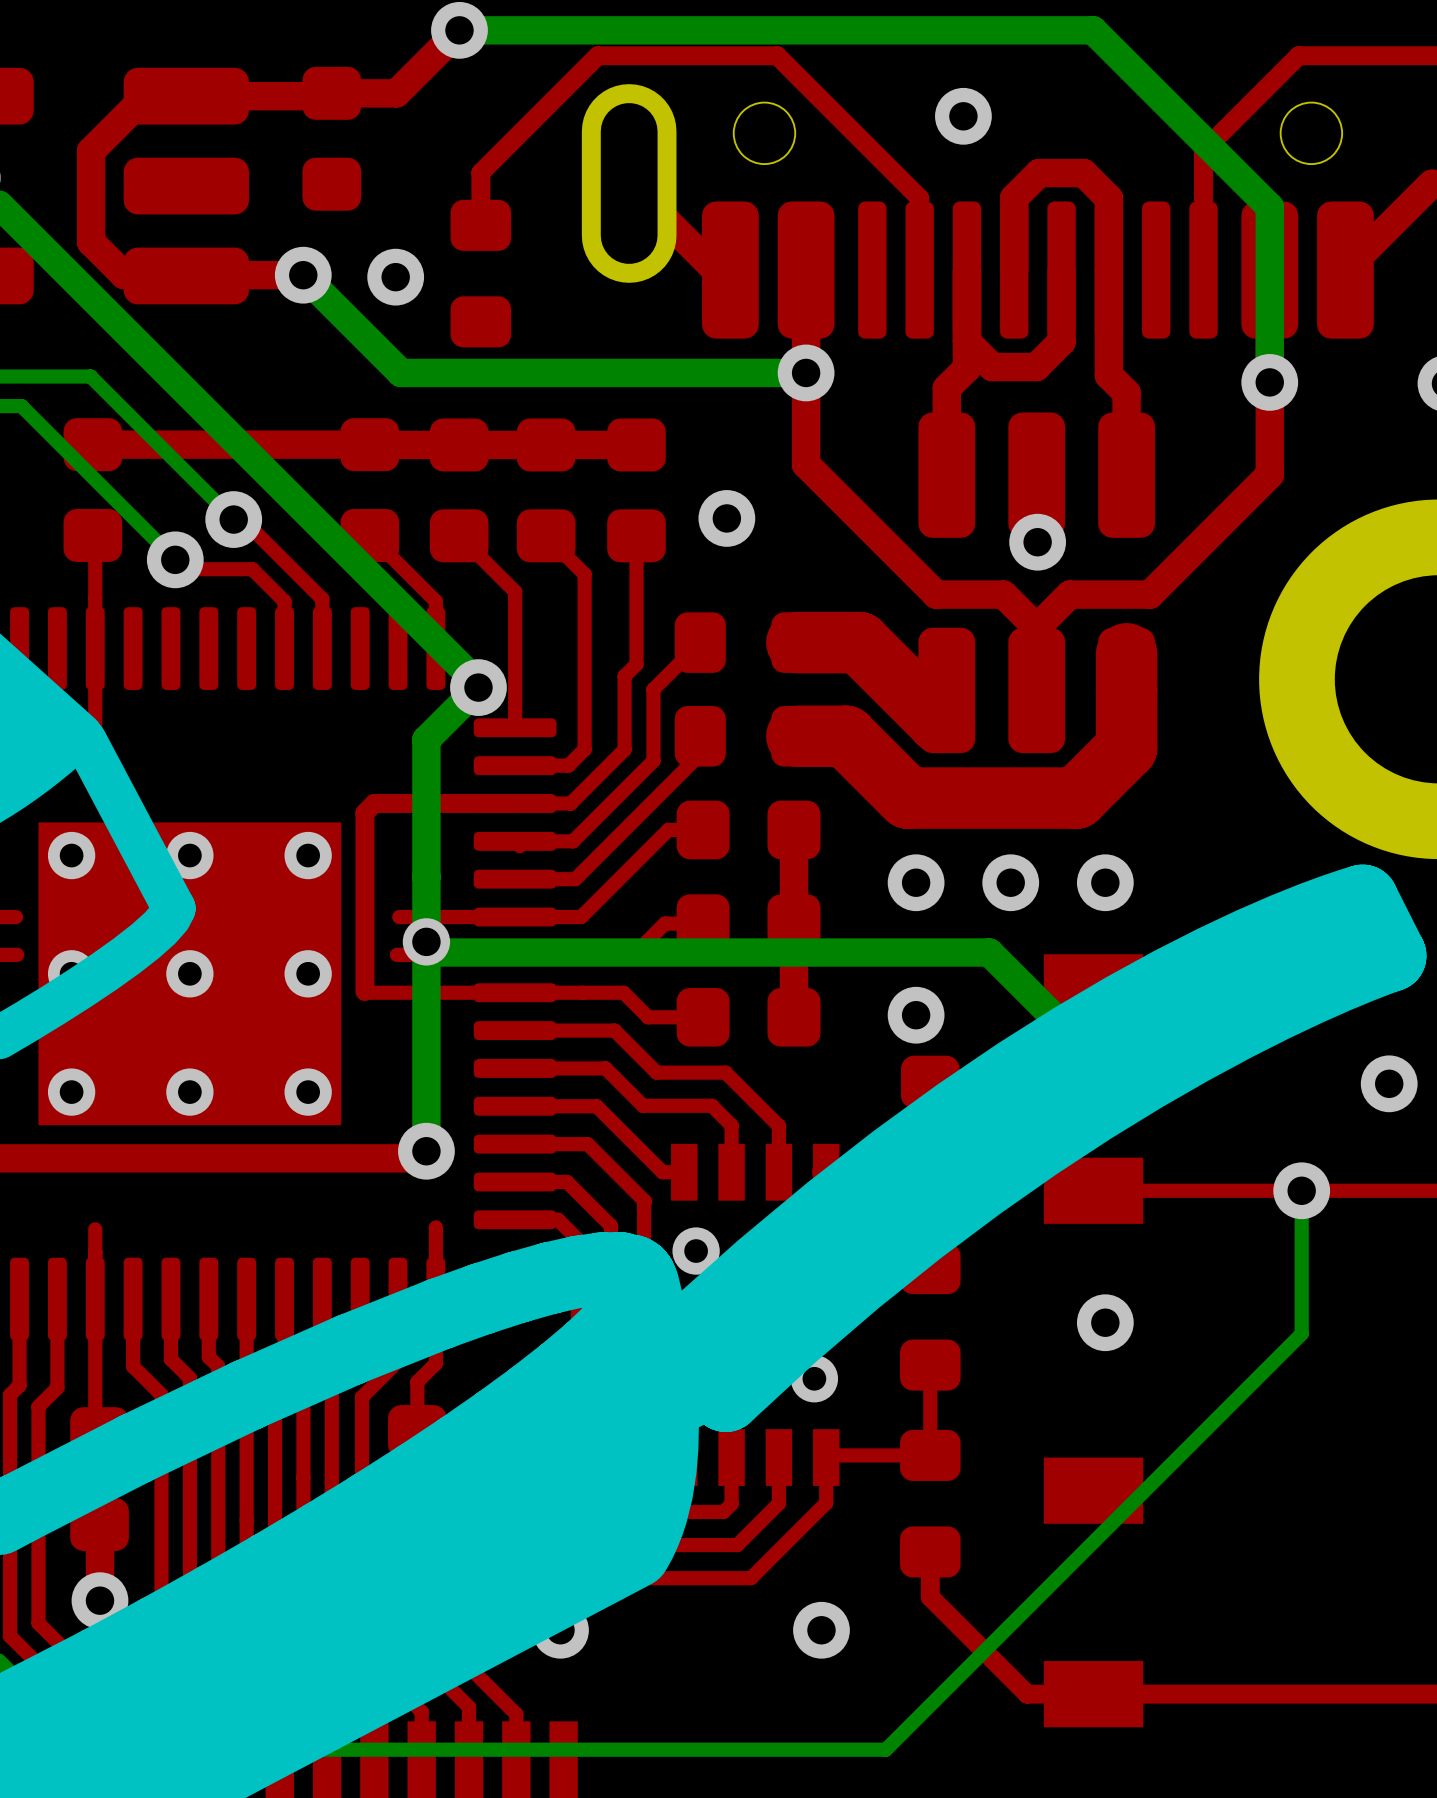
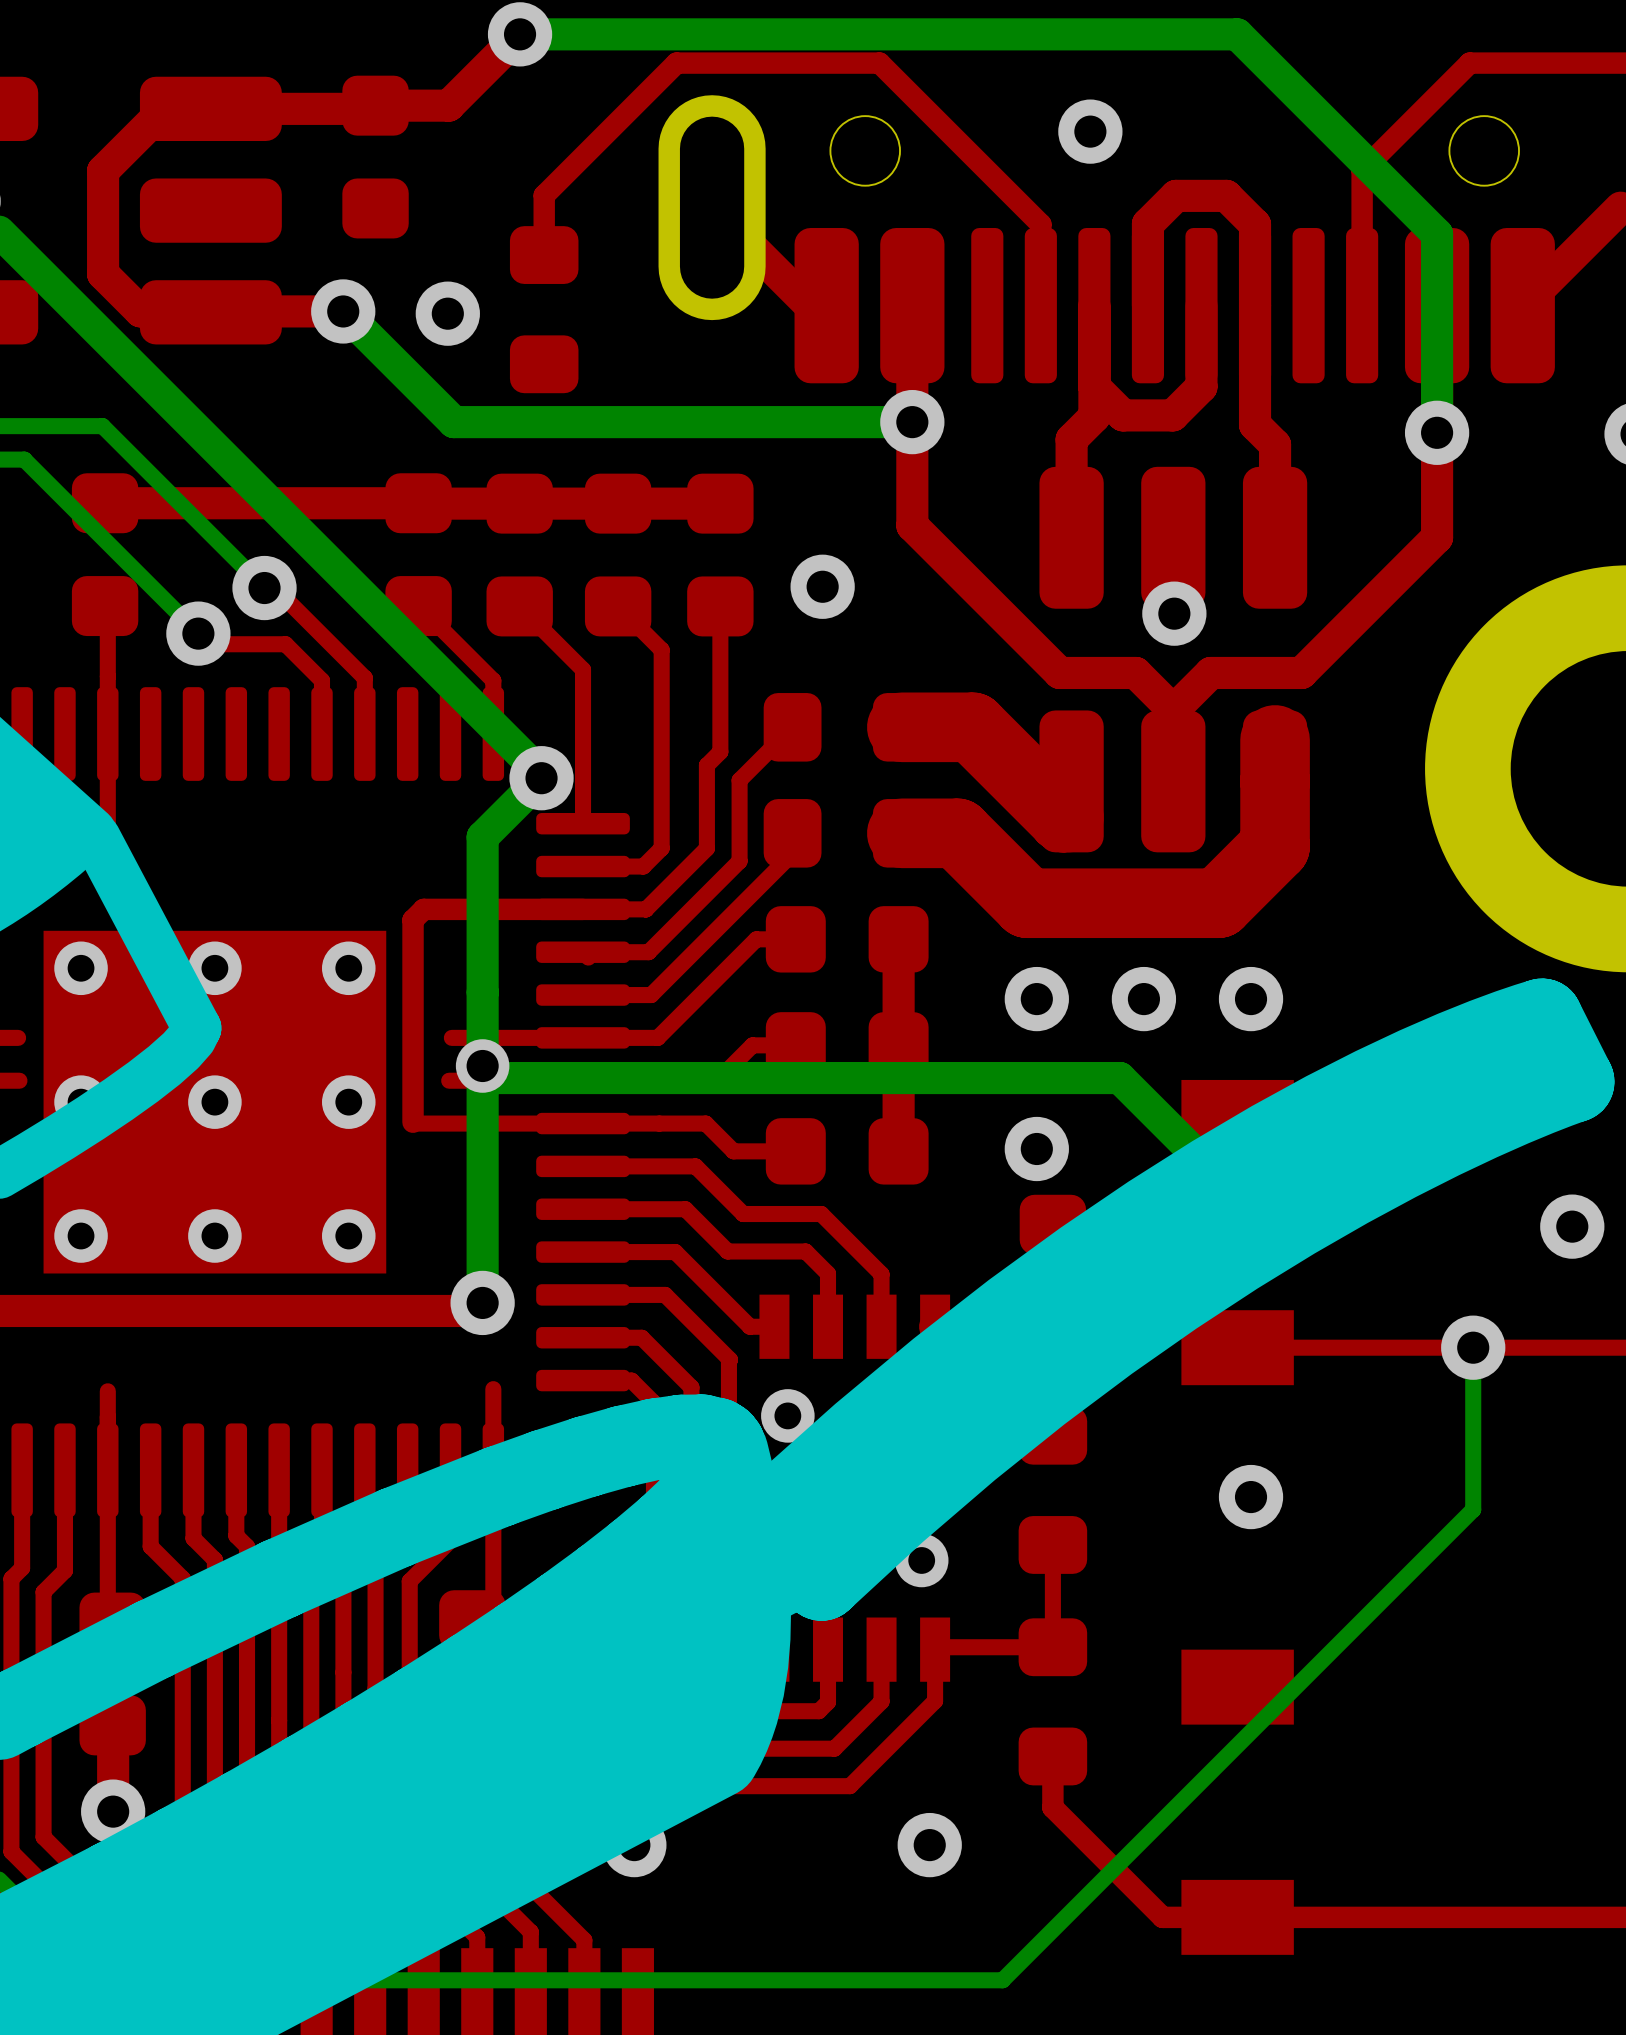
top track: (435, 1363) (417, 1381) (417, 1431) -> (493, 1543) (493, 1620)

